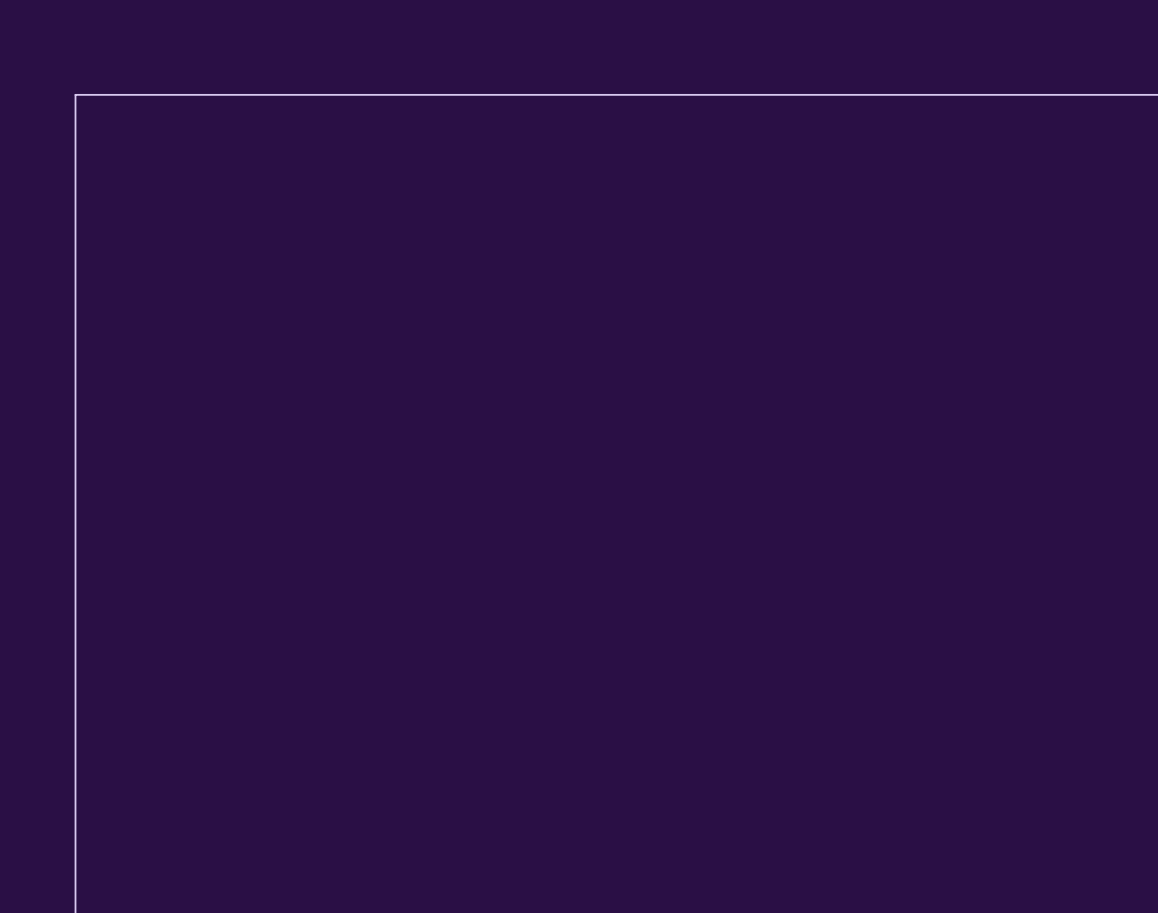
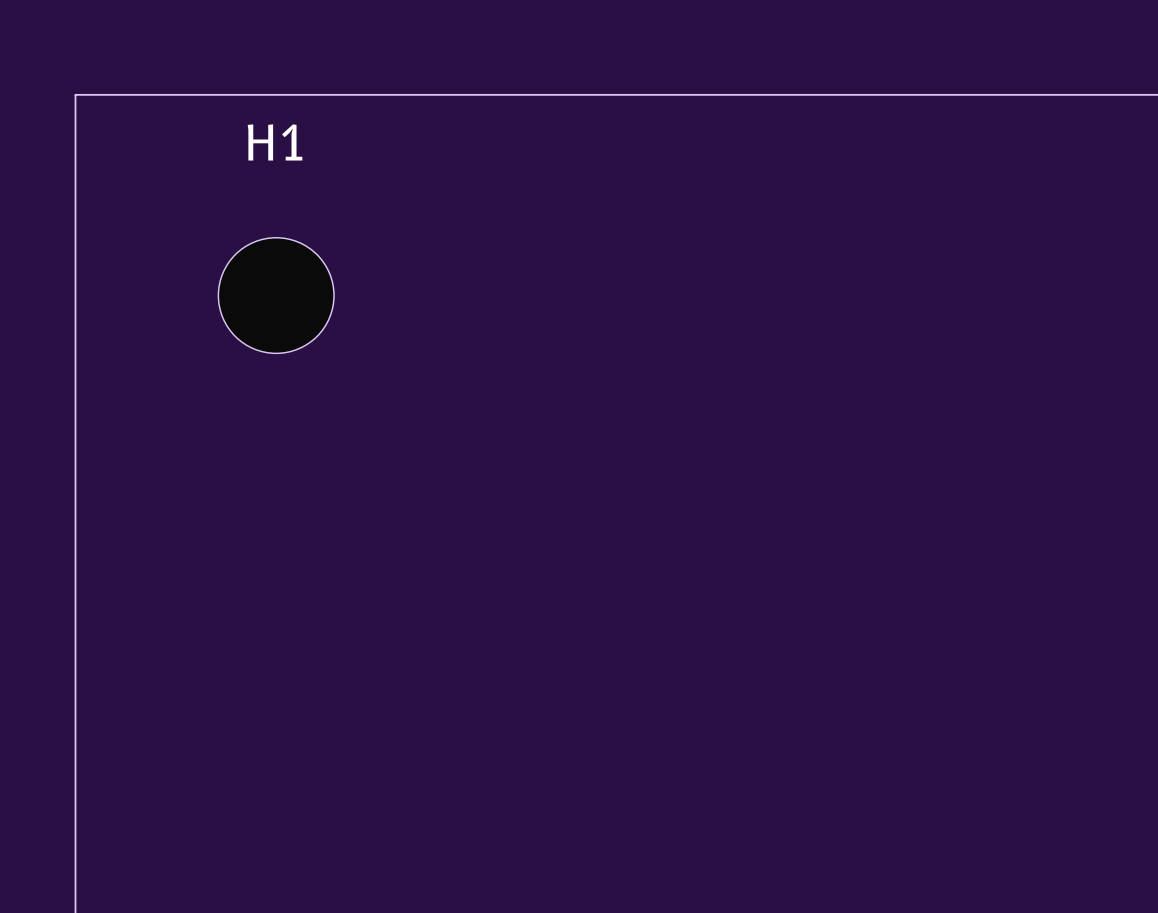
H1: none -> (276, 295)

